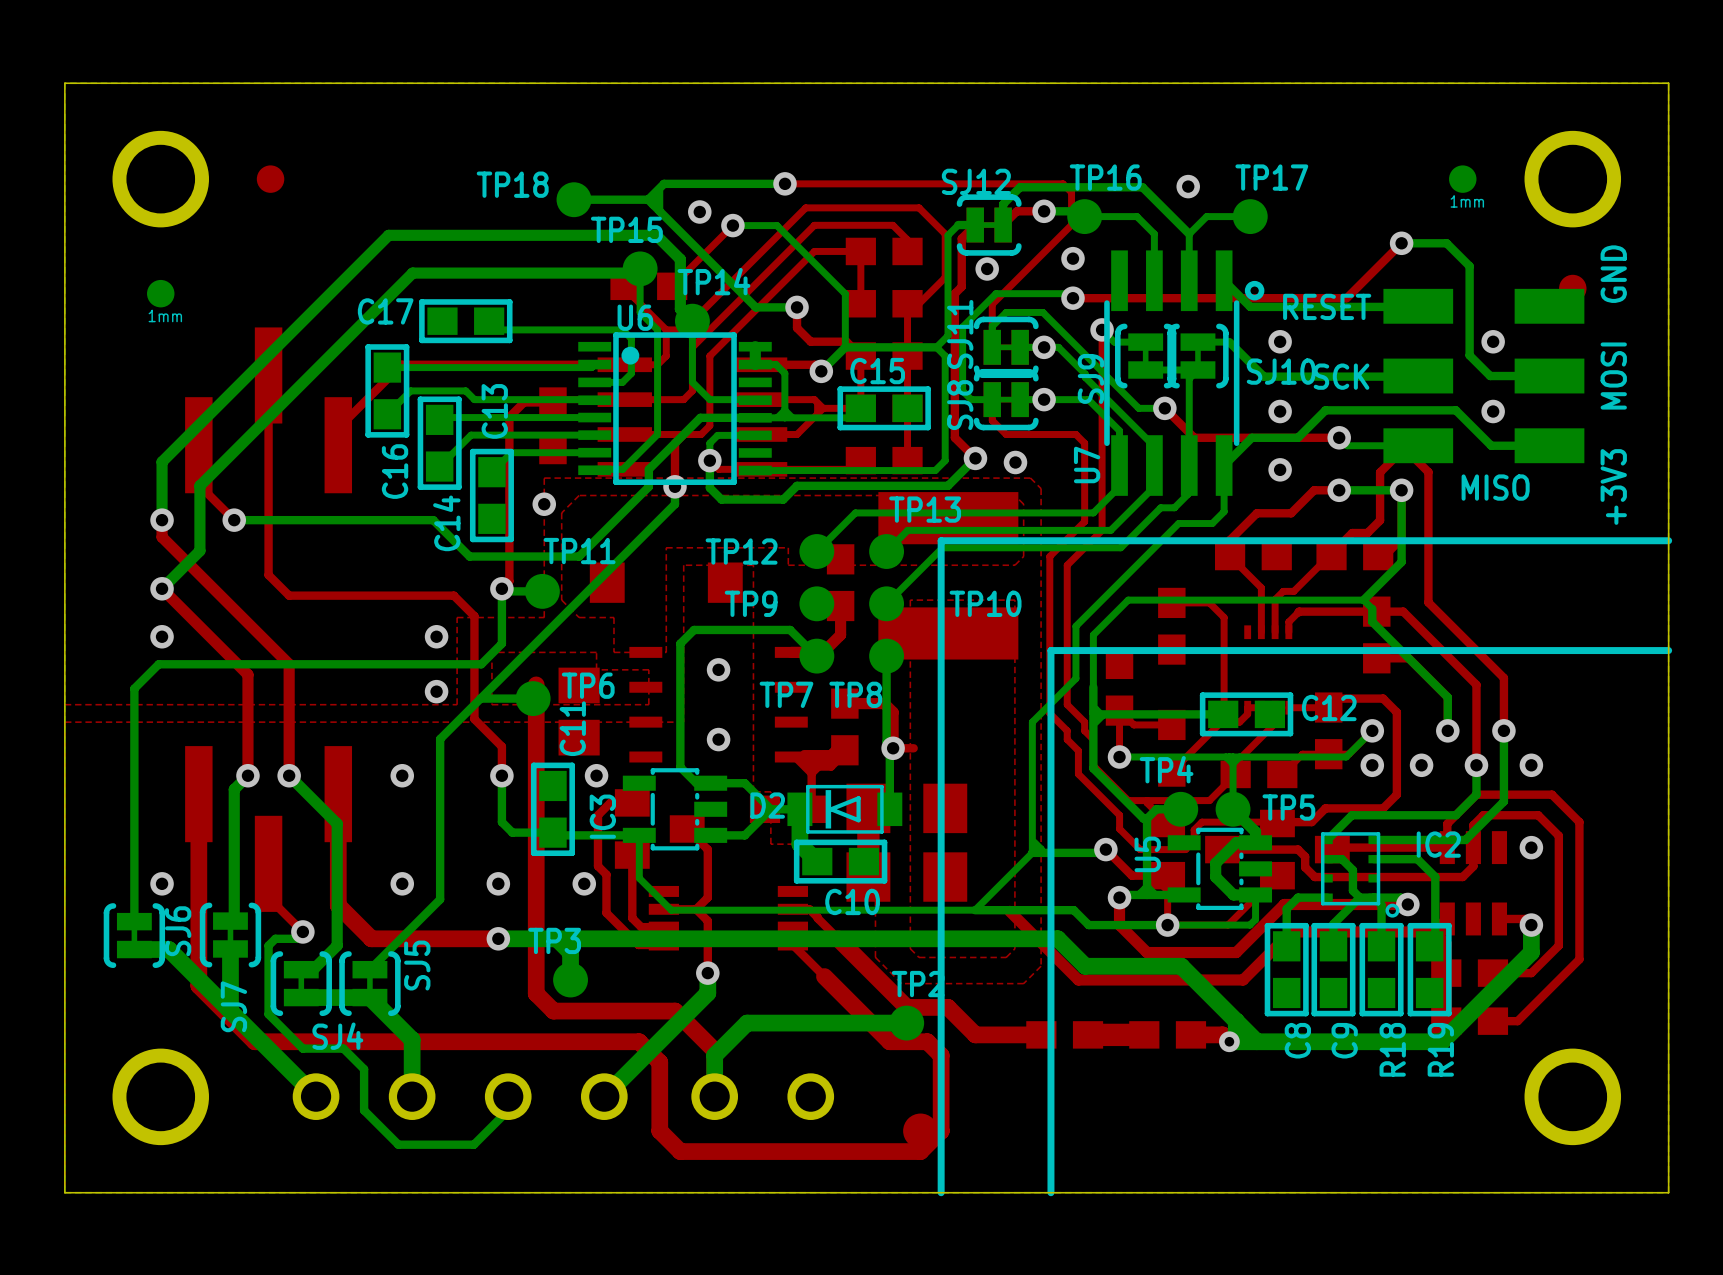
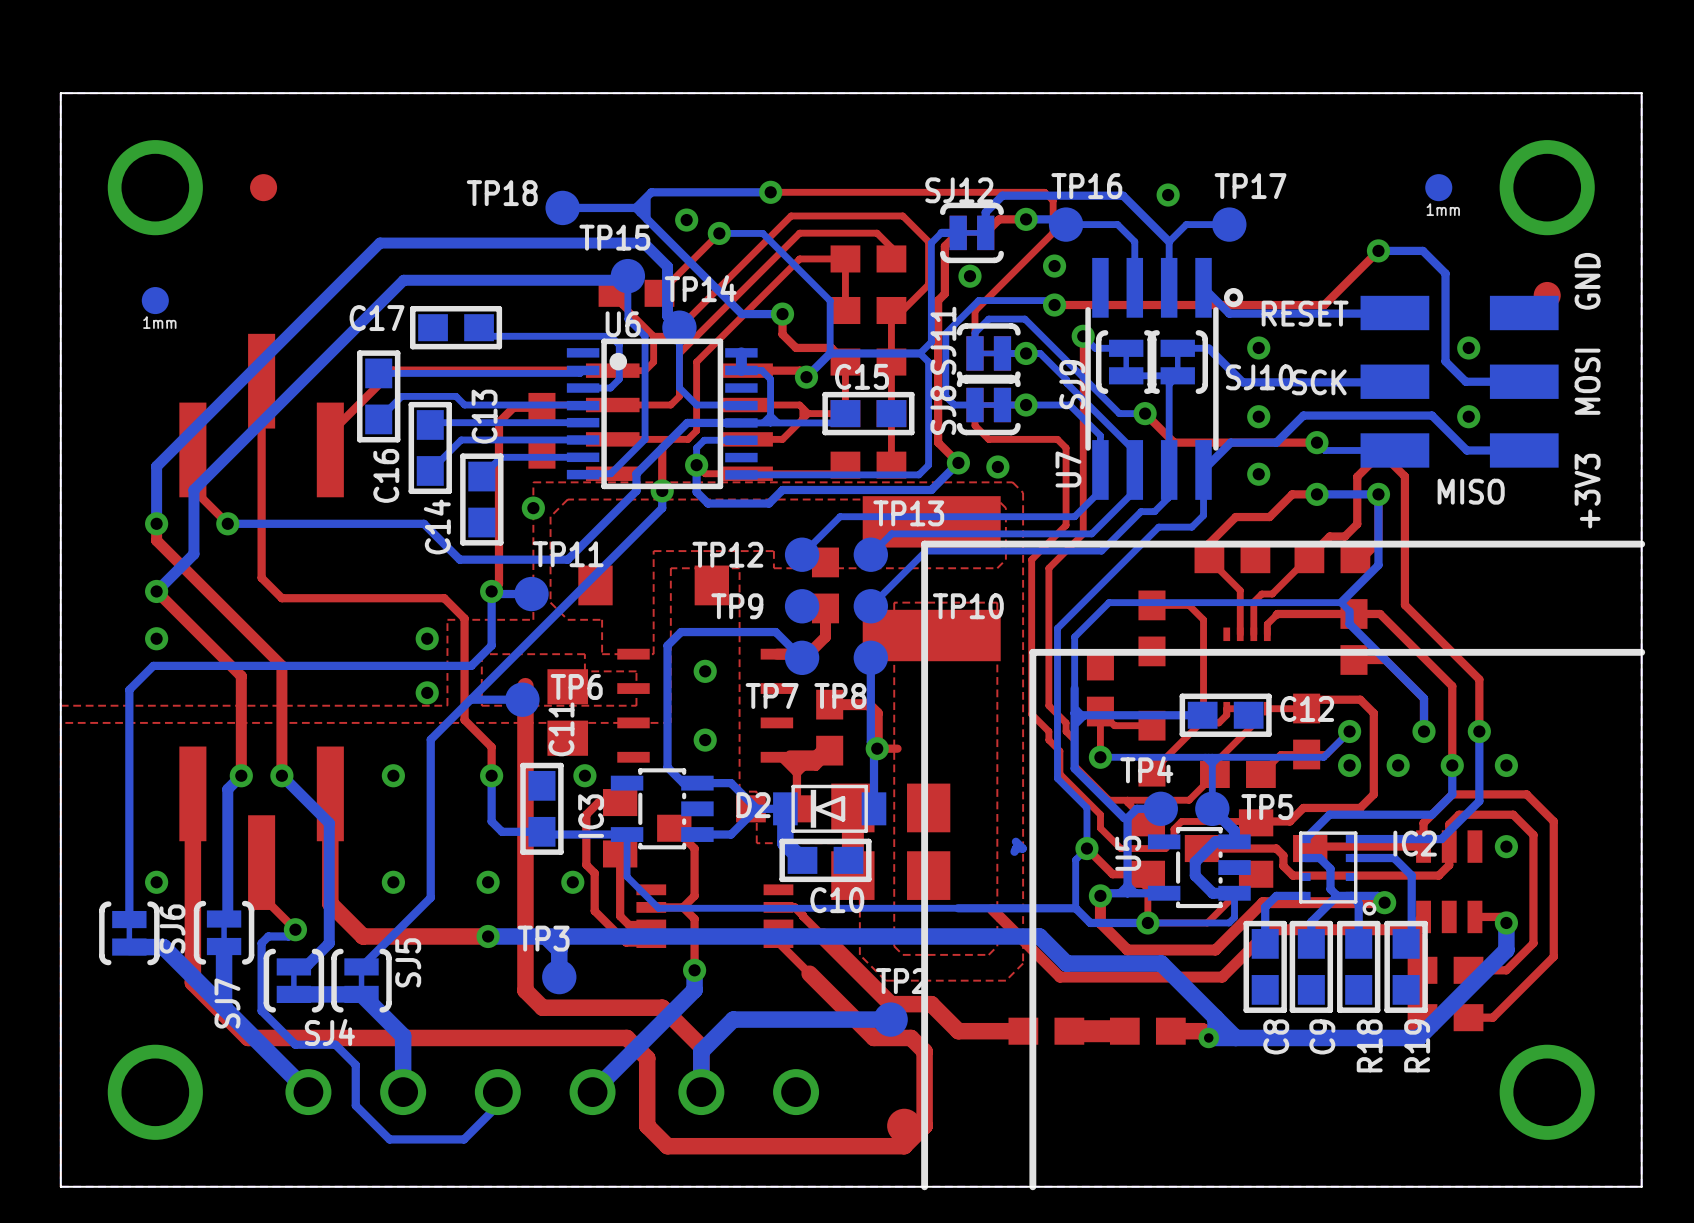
bottom track: (1075, 678) (1032, 722) (1032, 852) -> (1057, 679) (1057, 778) (1086, 807) (1086, 848)
bottom track: (1032, 852) (975, 910) -> none
bottom track: (1102, 852) (1032, 852) -> (1083, 851) (1075, 859) (1075, 908)
bottom track: (1073, 910) (1088, 925) (1109, 925) -> (1075, 908) (1090, 922)
bottom track: none -> (1075, 908) (1055, 908)

